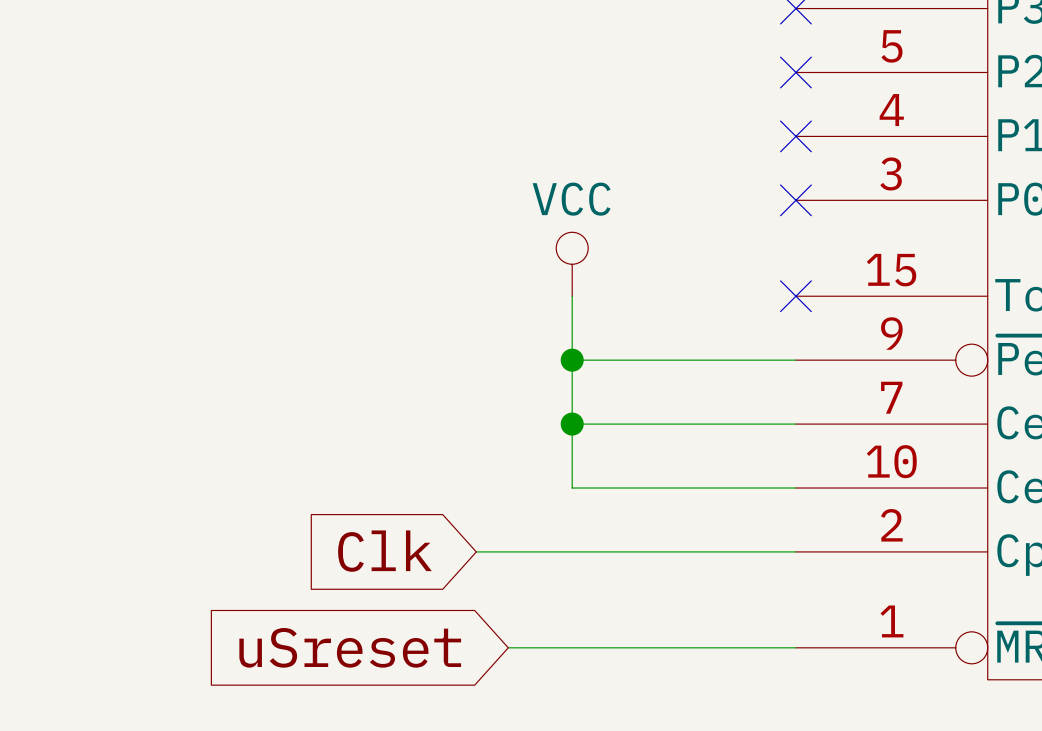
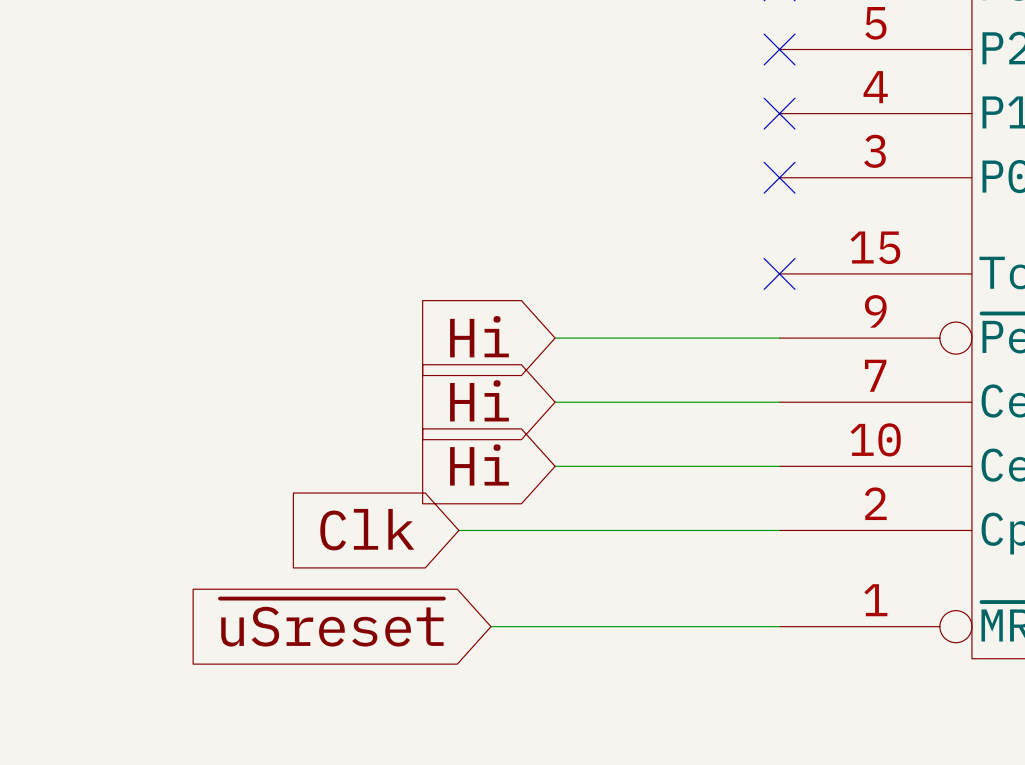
power symbol: VCC (572, 264) -> none
wire: (572, 296) (572, 488) -> none
global label: none -> Hi (479, 336)
junction: (572, 360) -> none
global label: none -> Hi (479, 400)
junction: (572, 424) -> none
global label: none -> Hi (479, 464)
global label: uSreset (350, 647) -> ~{uSreset} (331, 622)

